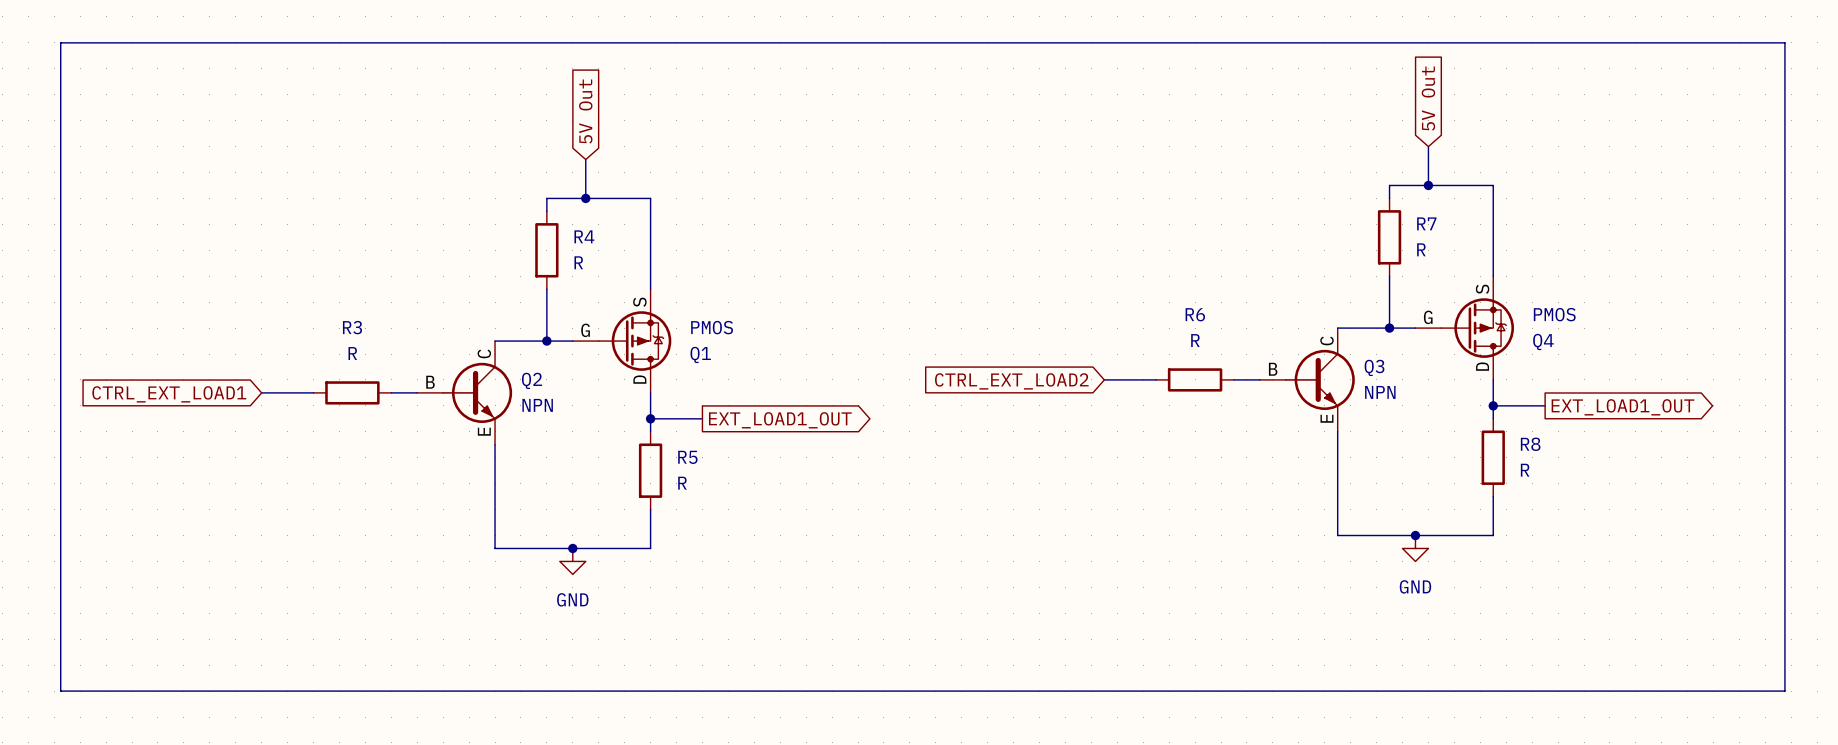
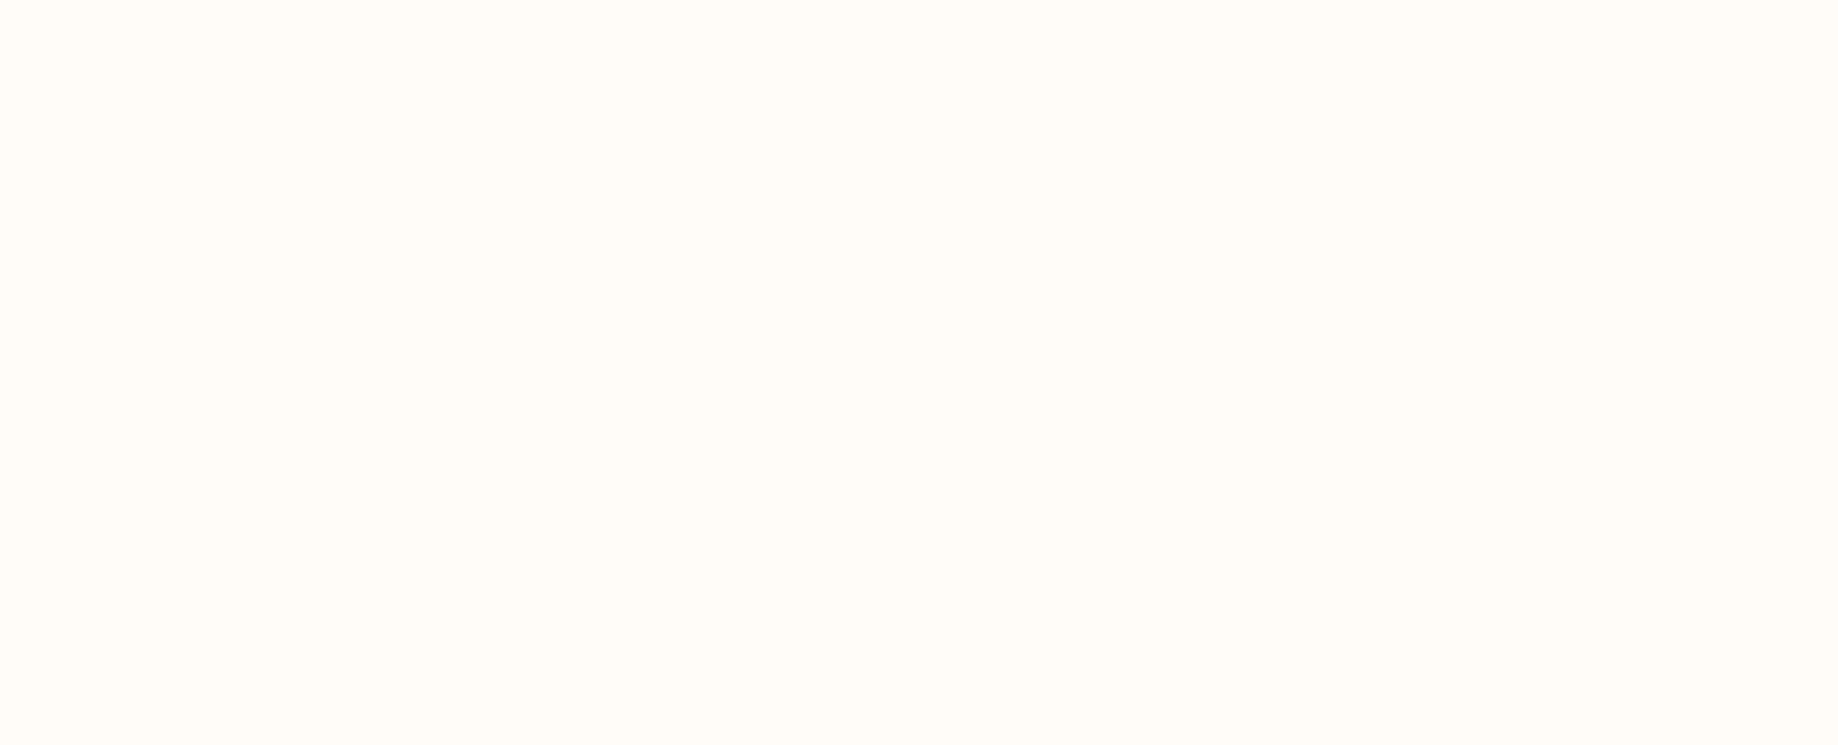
line: (60, 42) (1784, 42) (1784, 691) (60, 691) (60, 42) -> none
global label: 5V Out (1428, 98) -> none
global label: 5V Out (585, 111) -> none
wire: (1428, 146) (1428, 185) -> none
wire: (585, 159) (585, 198) -> none
junction: (1428, 185) -> none
junction: (585, 198) -> none
wire: (1389, 198) (1389, 185) (1493, 185) (1493, 276) -> none
wire: (546, 211) (546, 198) (650, 198) (650, 289) -> none
R7: R (1389, 237) -> none
R4: R (546, 250) -> none
wire: (1389, 276) (1389, 328) -> none
wire: (546, 289) (546, 341) -> none
wire: (1337, 328) (1415, 328) -> none
junction: (1389, 328) -> none
Q4: PMOS (1464, 328) -> none
wire: (495, 341) (572, 341) -> none
junction: (546, 341) -> none
Q1: PMOS (622, 341) -> none
wire: (1104, 379) (1156, 379) -> none
R6: R (1195, 379) -> none
wire: (1233, 379) (1259, 379) -> none
Q3: NPN (1307, 379) -> none
wire: (1493, 379) (1493, 418) -> none
global label: CTRL_EXT_LOAD2 (1011, 381) -> none
wire: (261, 392) (313, 392) -> none
R3: R (352, 392) -> none
wire: (391, 392) (417, 392) -> none
Q2: NPN (464, 392) -> none
wire: (650, 392) (650, 431) -> none
global label: CTRL_EXT_LOAD1 (169, 394) -> none
wire: (1493, 405) (1545, 405) -> none
junction: (1493, 405) -> none
global label: EXT_LOAD1_OUT (1623, 407) -> none
wire: (650, 418) (702, 418) -> none
junction: (650, 418) -> none
global label: EXT_LOAD1_OUT (780, 420) -> none
wire: (1337, 431) (1337, 535) (1493, 535) (1493, 496) -> none
wire: (495, 444) (495, 548) (650, 548) (650, 509) -> none
R8: R (1493, 457) -> none
R5: R (650, 470) -> none
junction: (1415, 535) -> none
junction: (572, 548) -> none
power symbol: GND (1415, 548) -> none
power symbol: GND (572, 561) -> none

